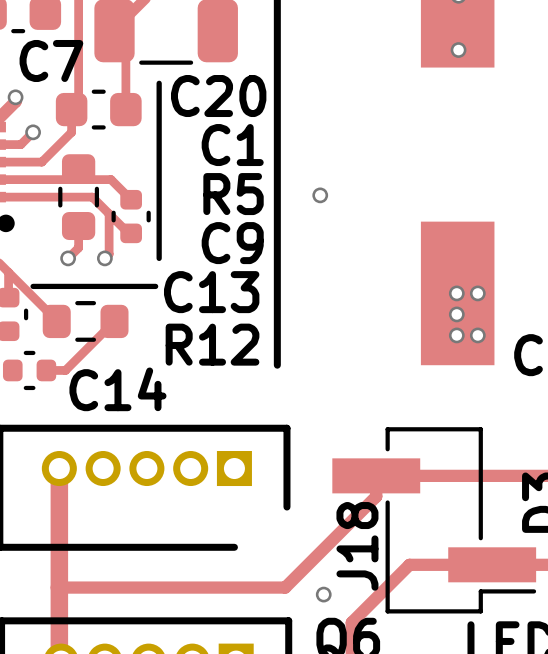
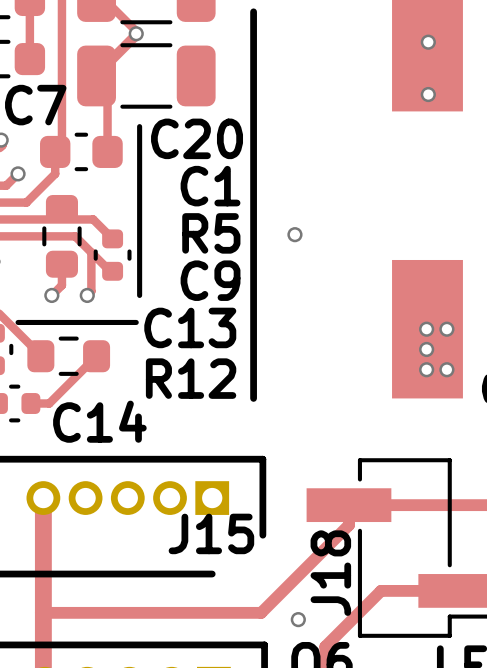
J15 name: none -> J15 (211, 533)

